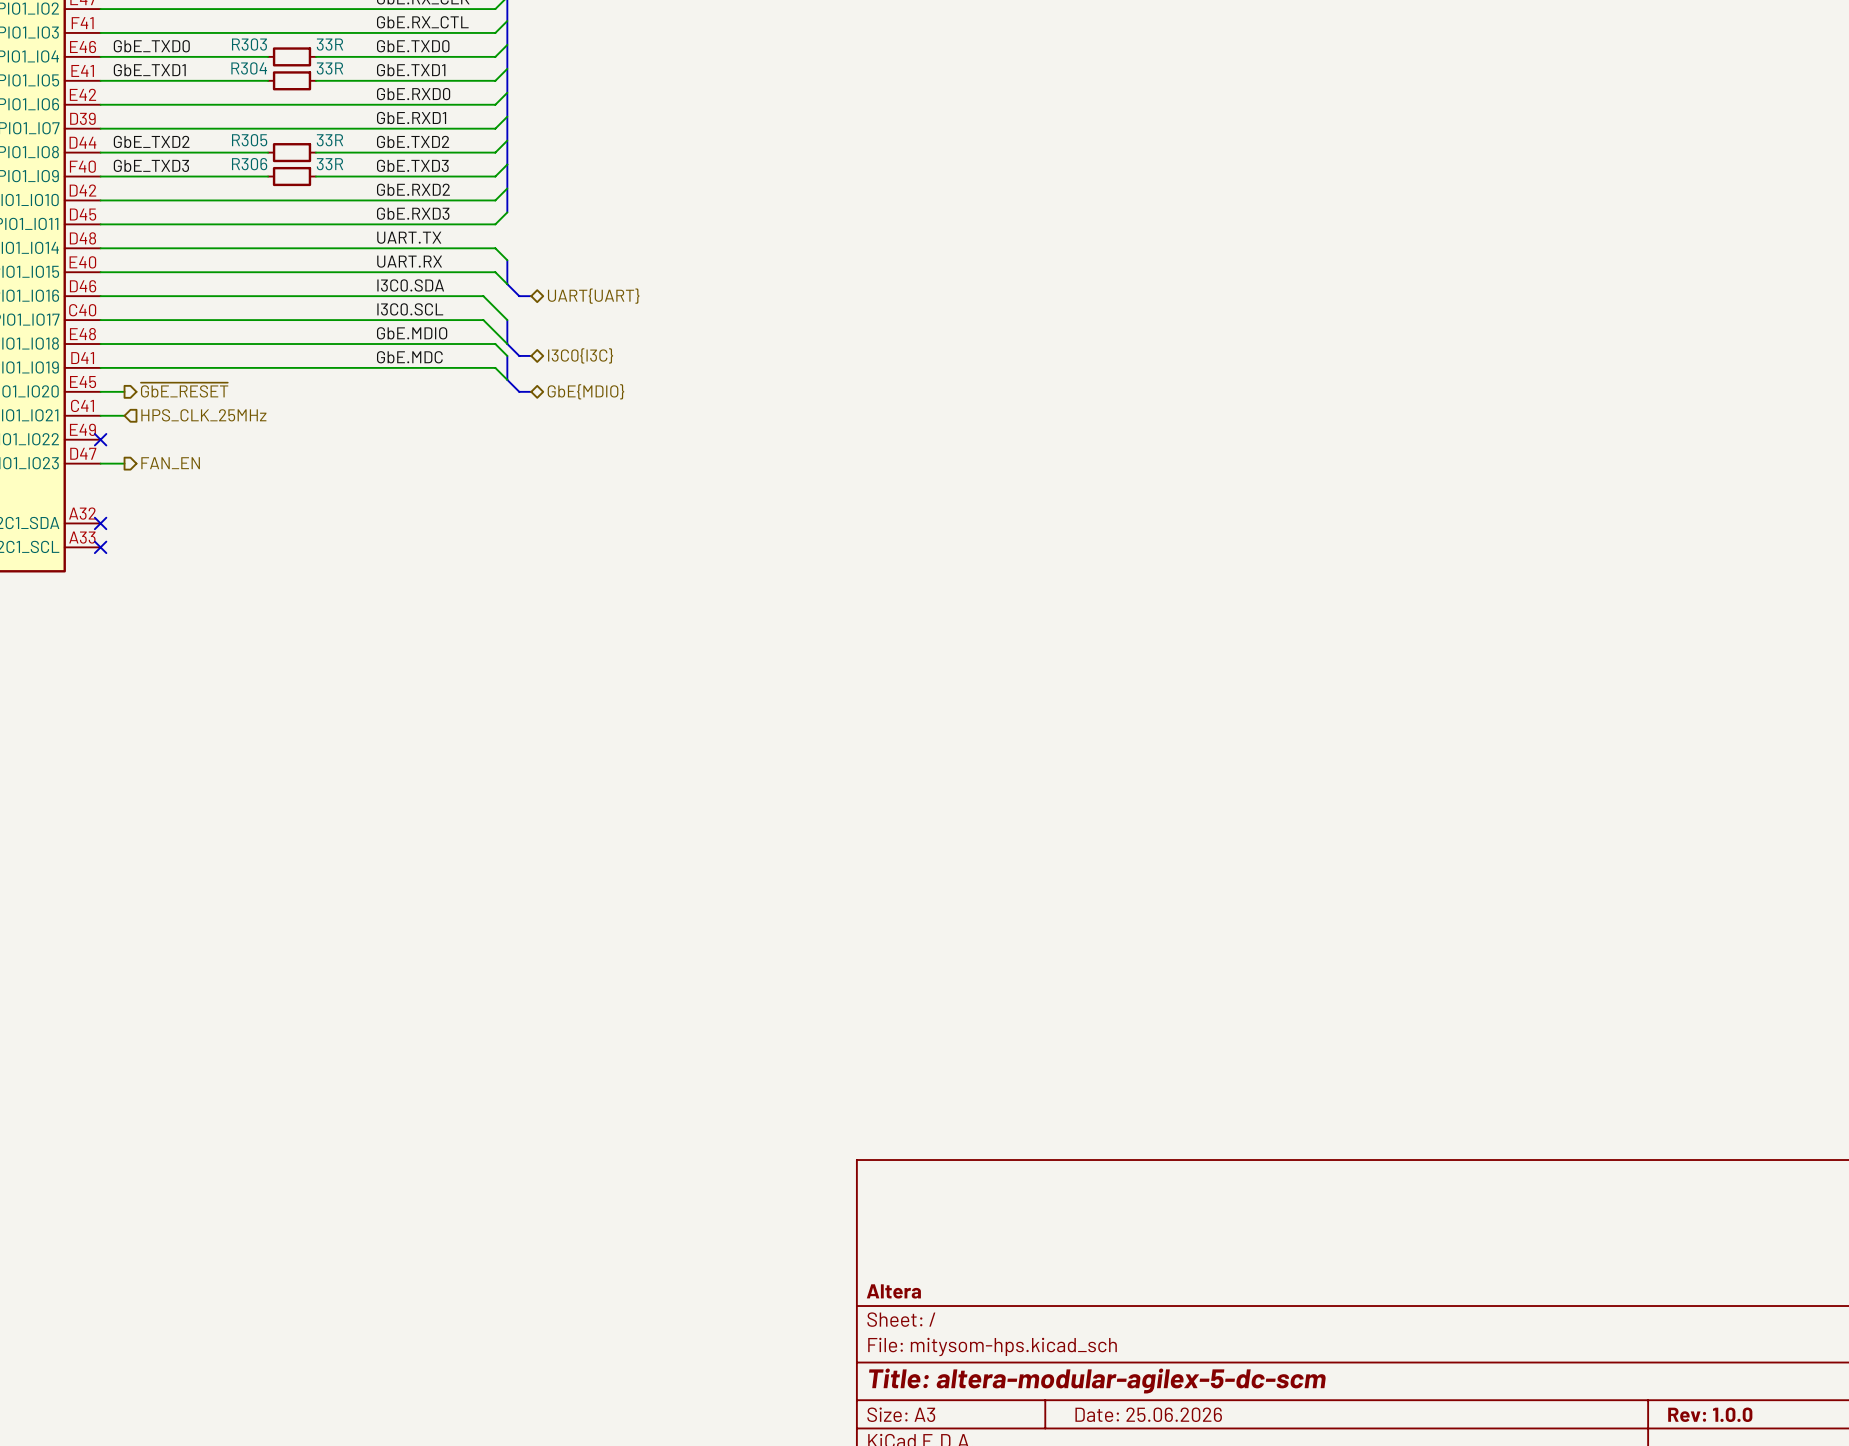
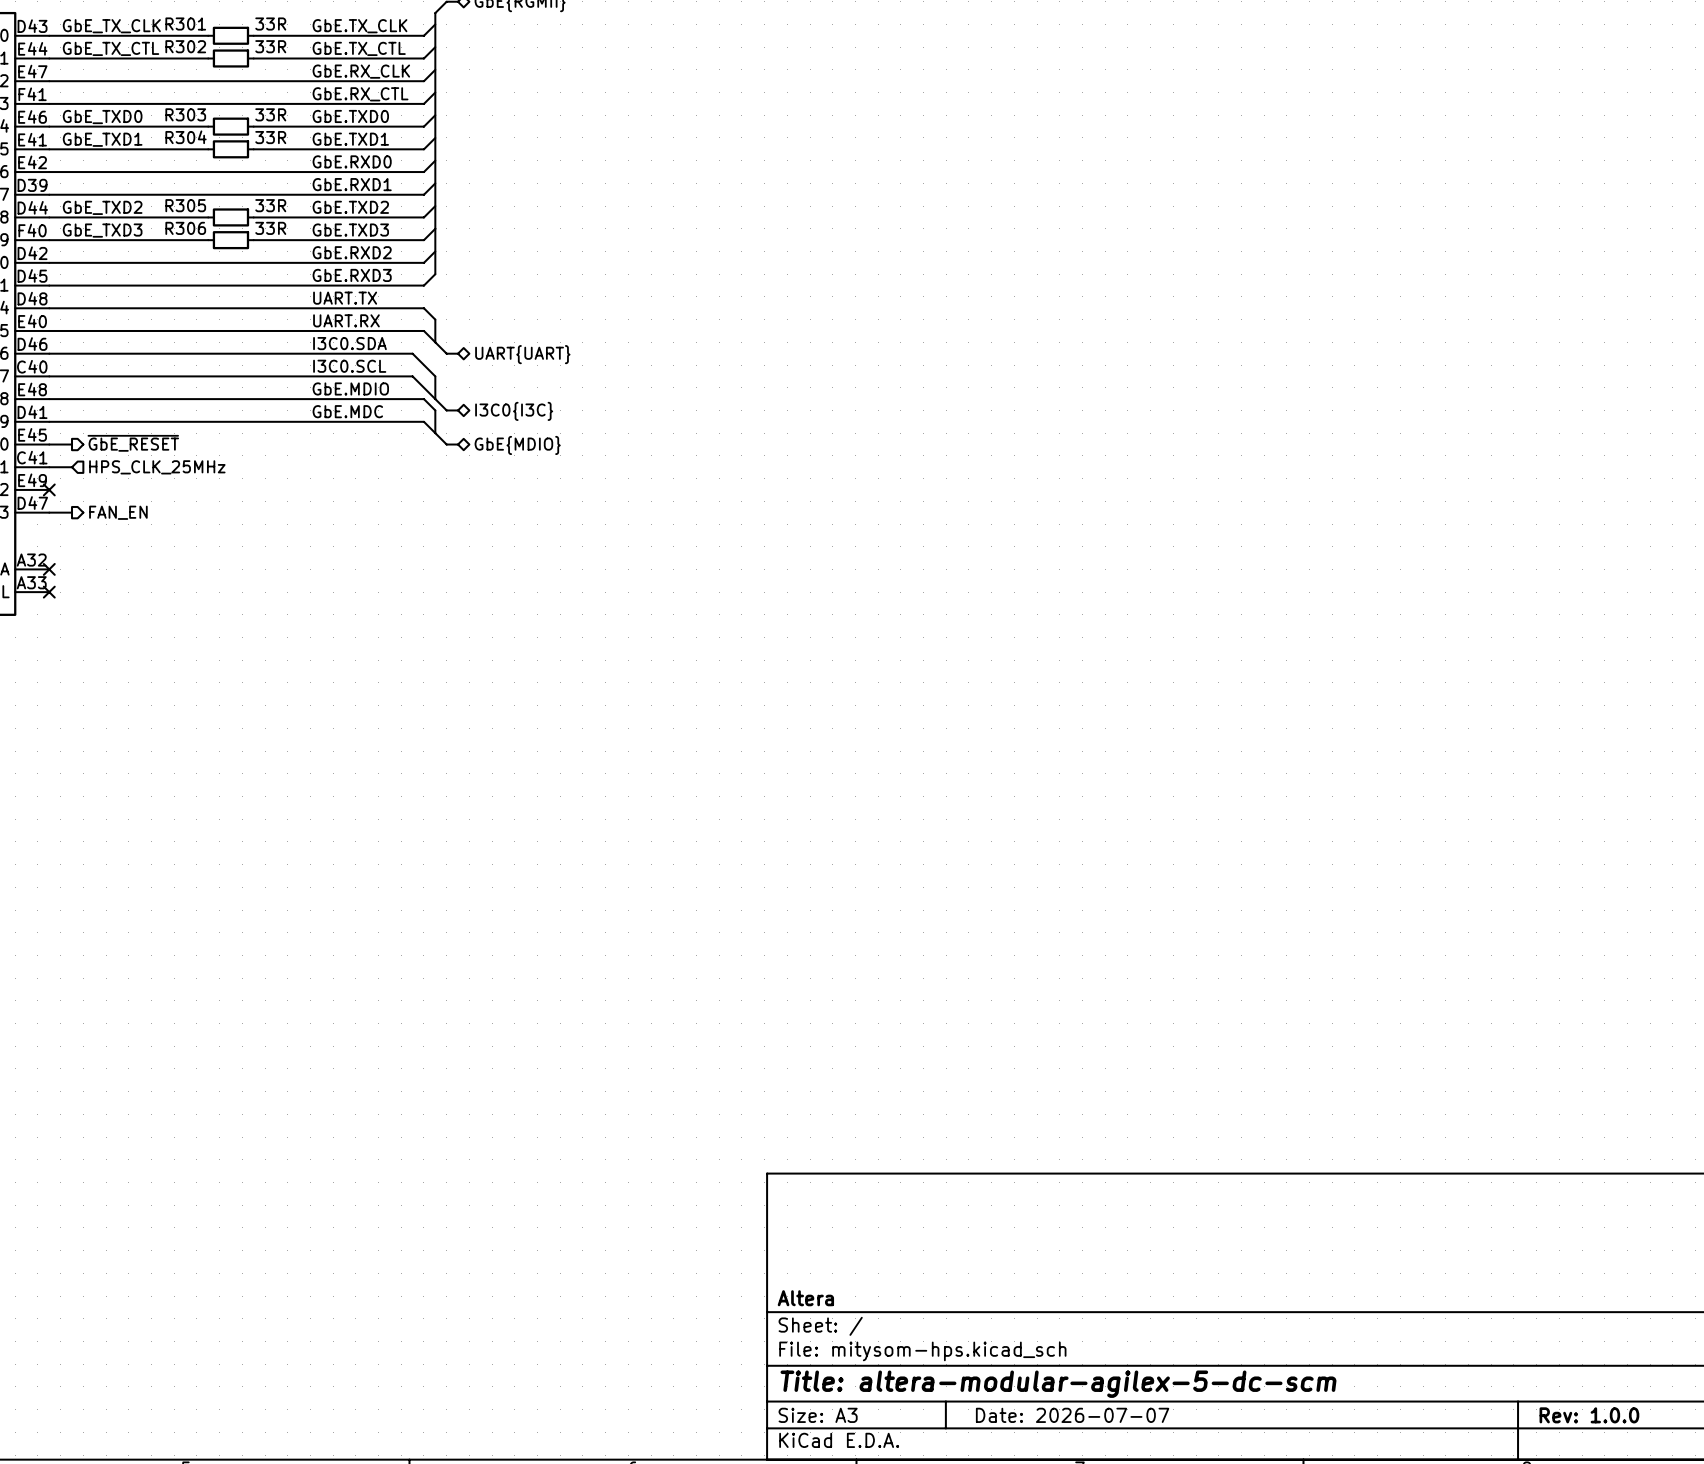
title block: Date: 25.06.2026 (1148, 1414) -> Date: 2026-07-07 (1072, 1415)

